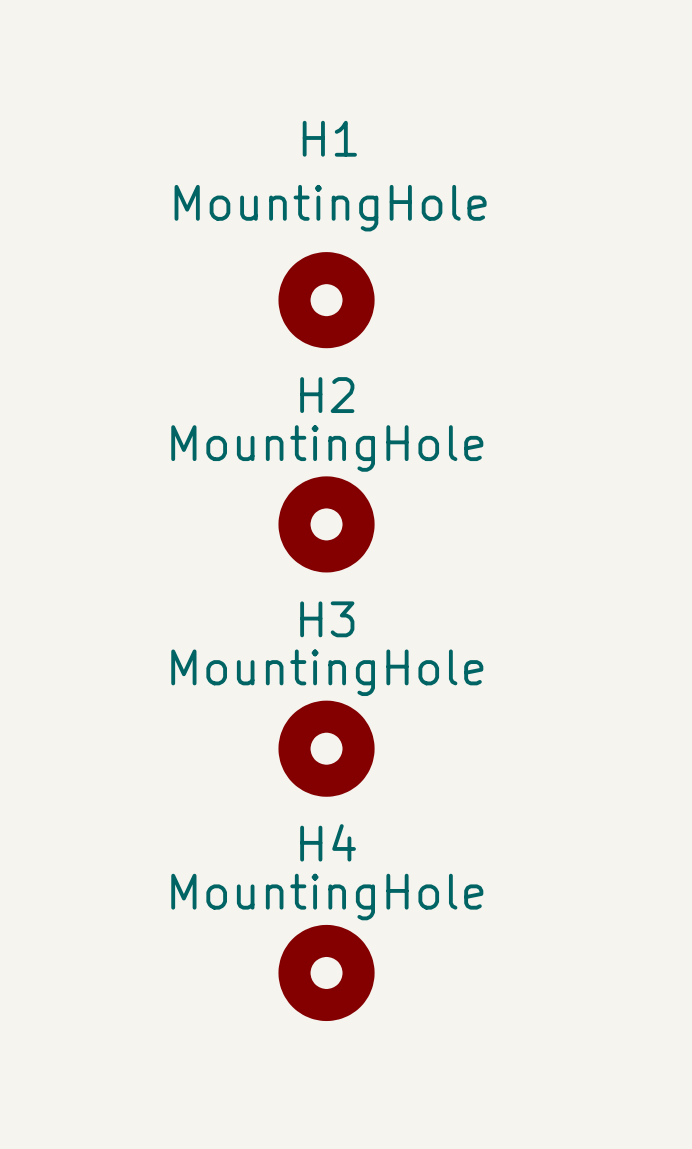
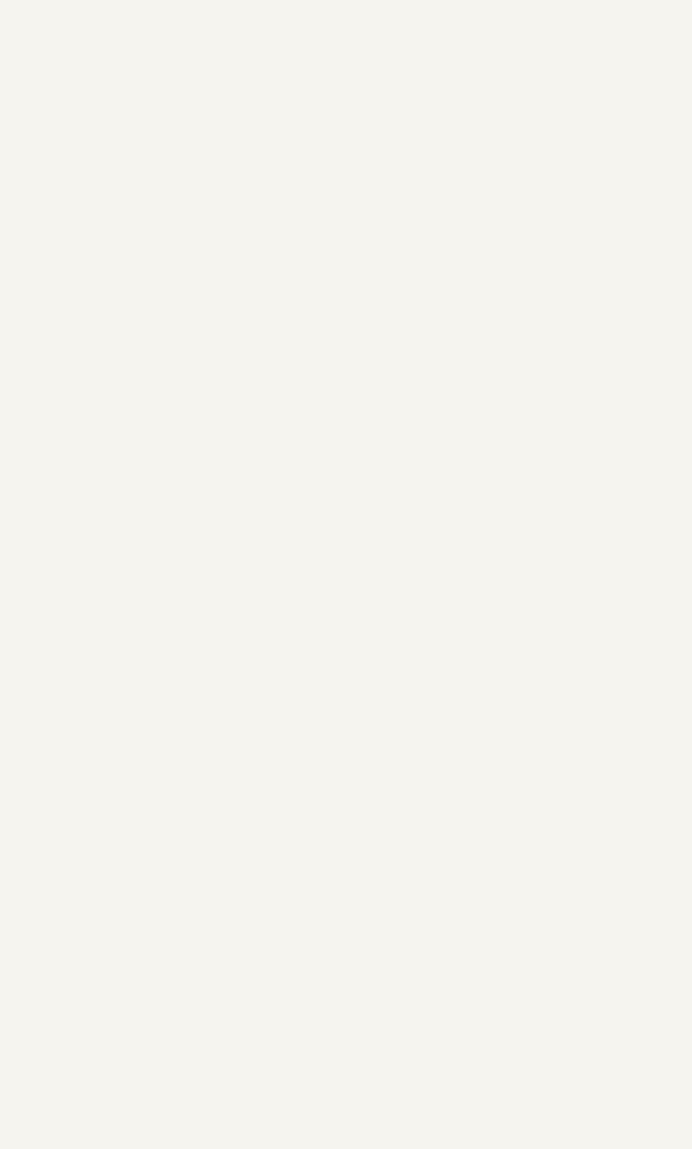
H1: MountingHole (326, 300) -> none
H2: MountingHole (326, 524) -> none
H3: MountingHole (326, 748) -> none
H4: MountingHole (326, 972) -> none

